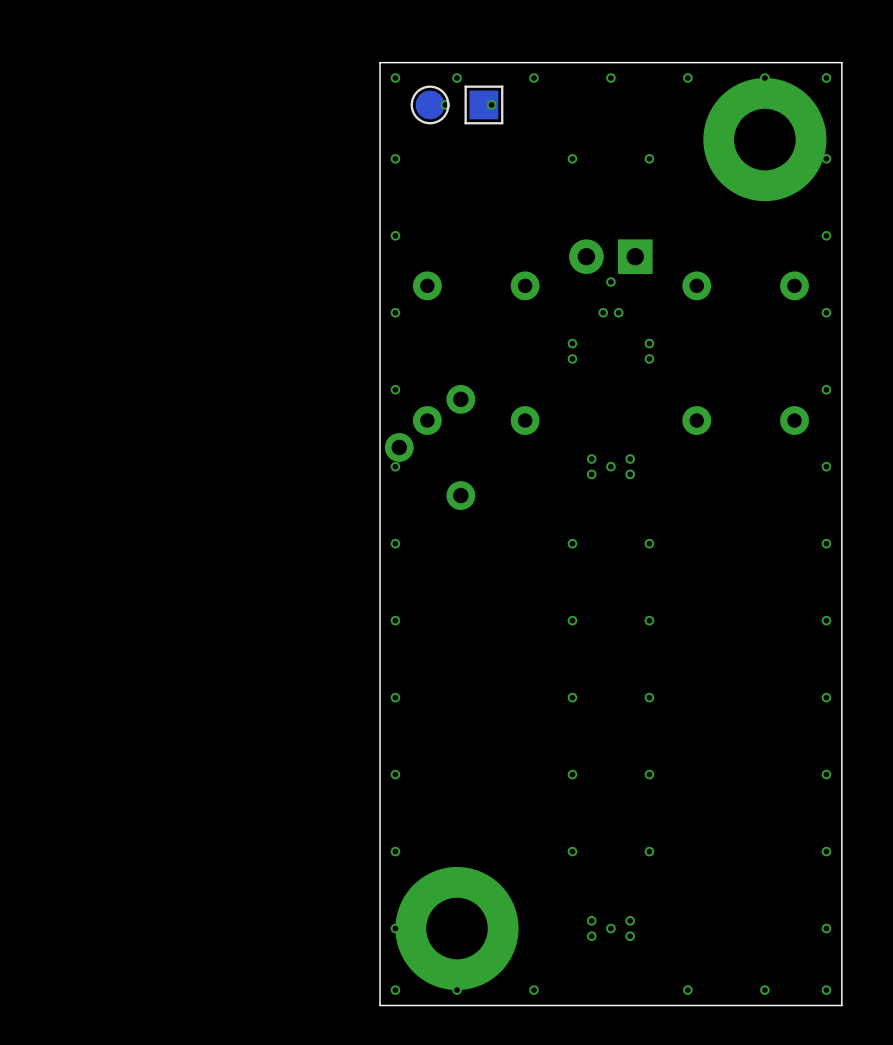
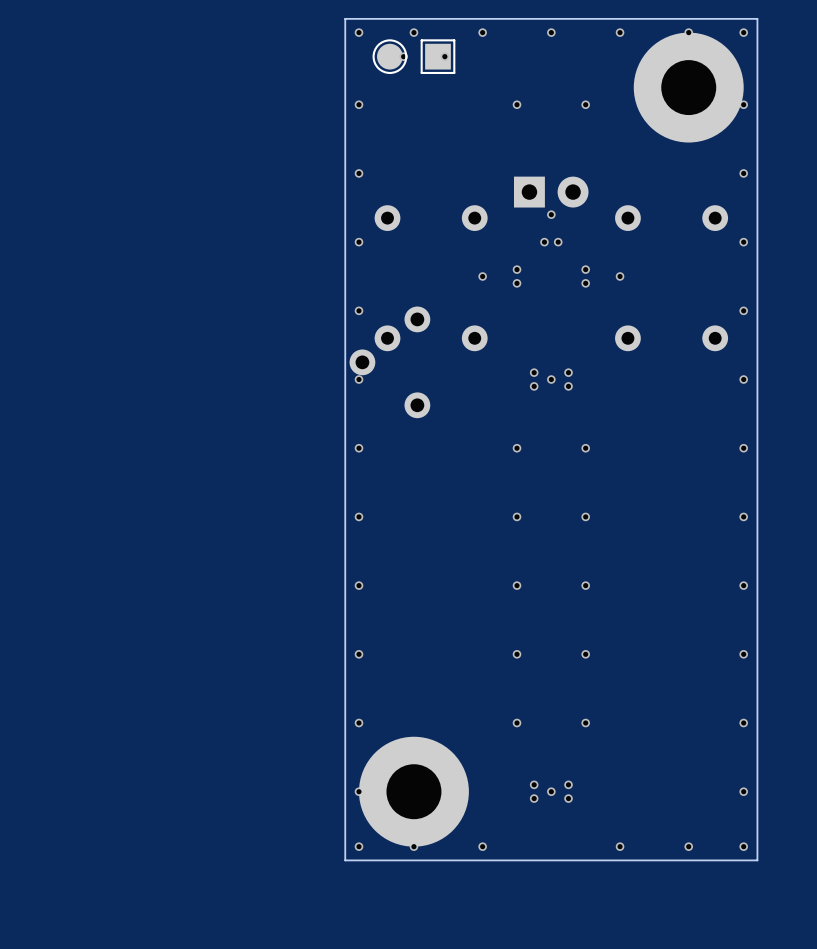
part rotation: 0° (610, 256) -> 180° (551, 192)
via: none -> (482, 276)
via: none -> (620, 276)

